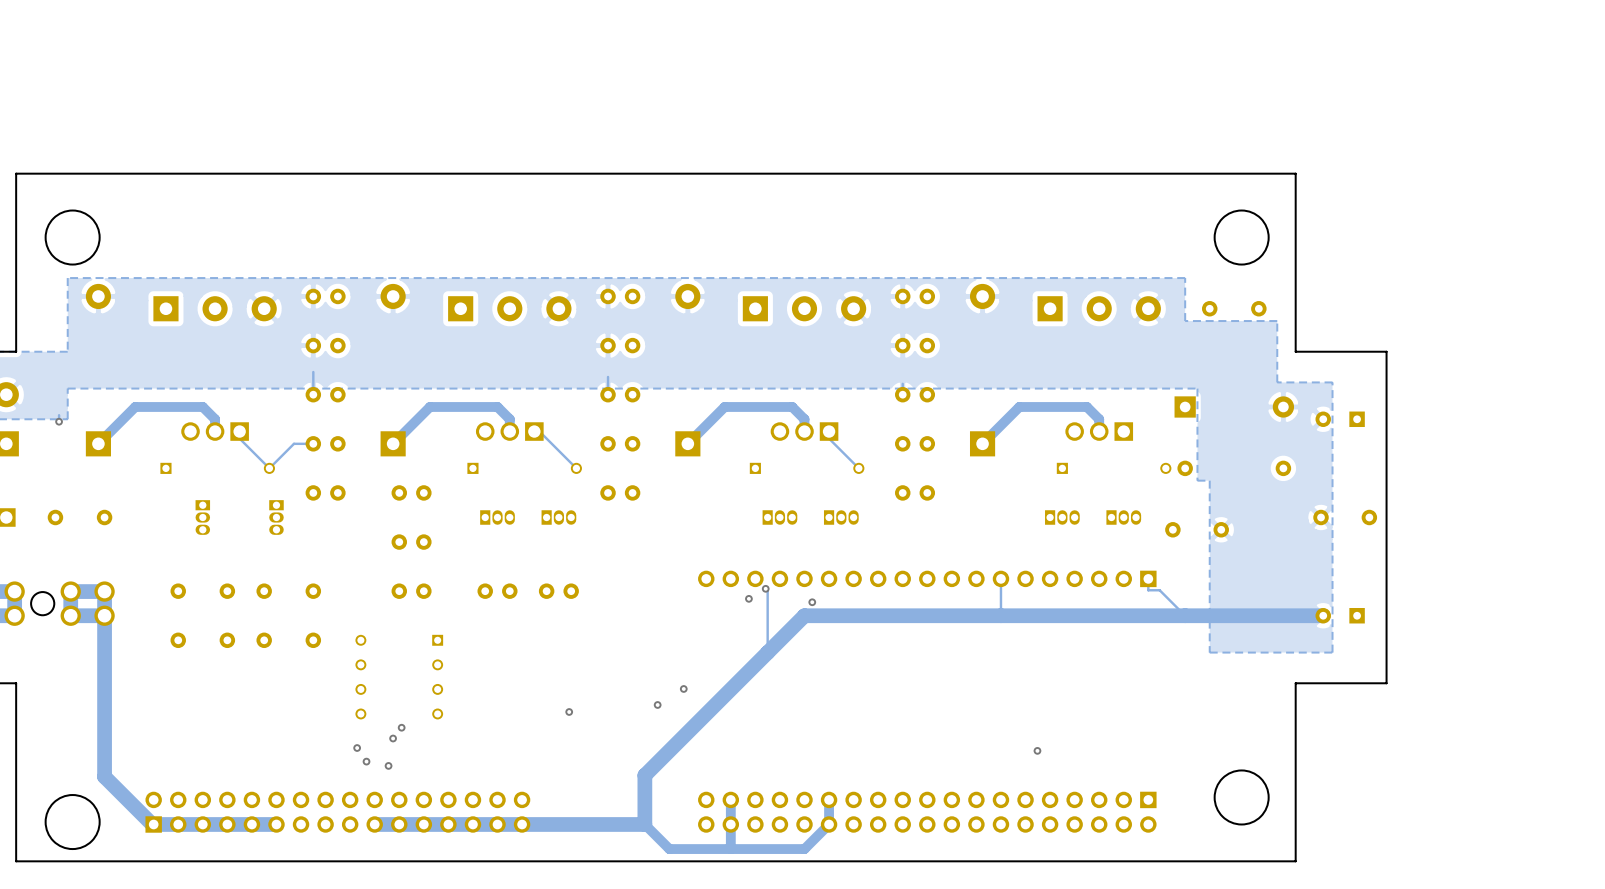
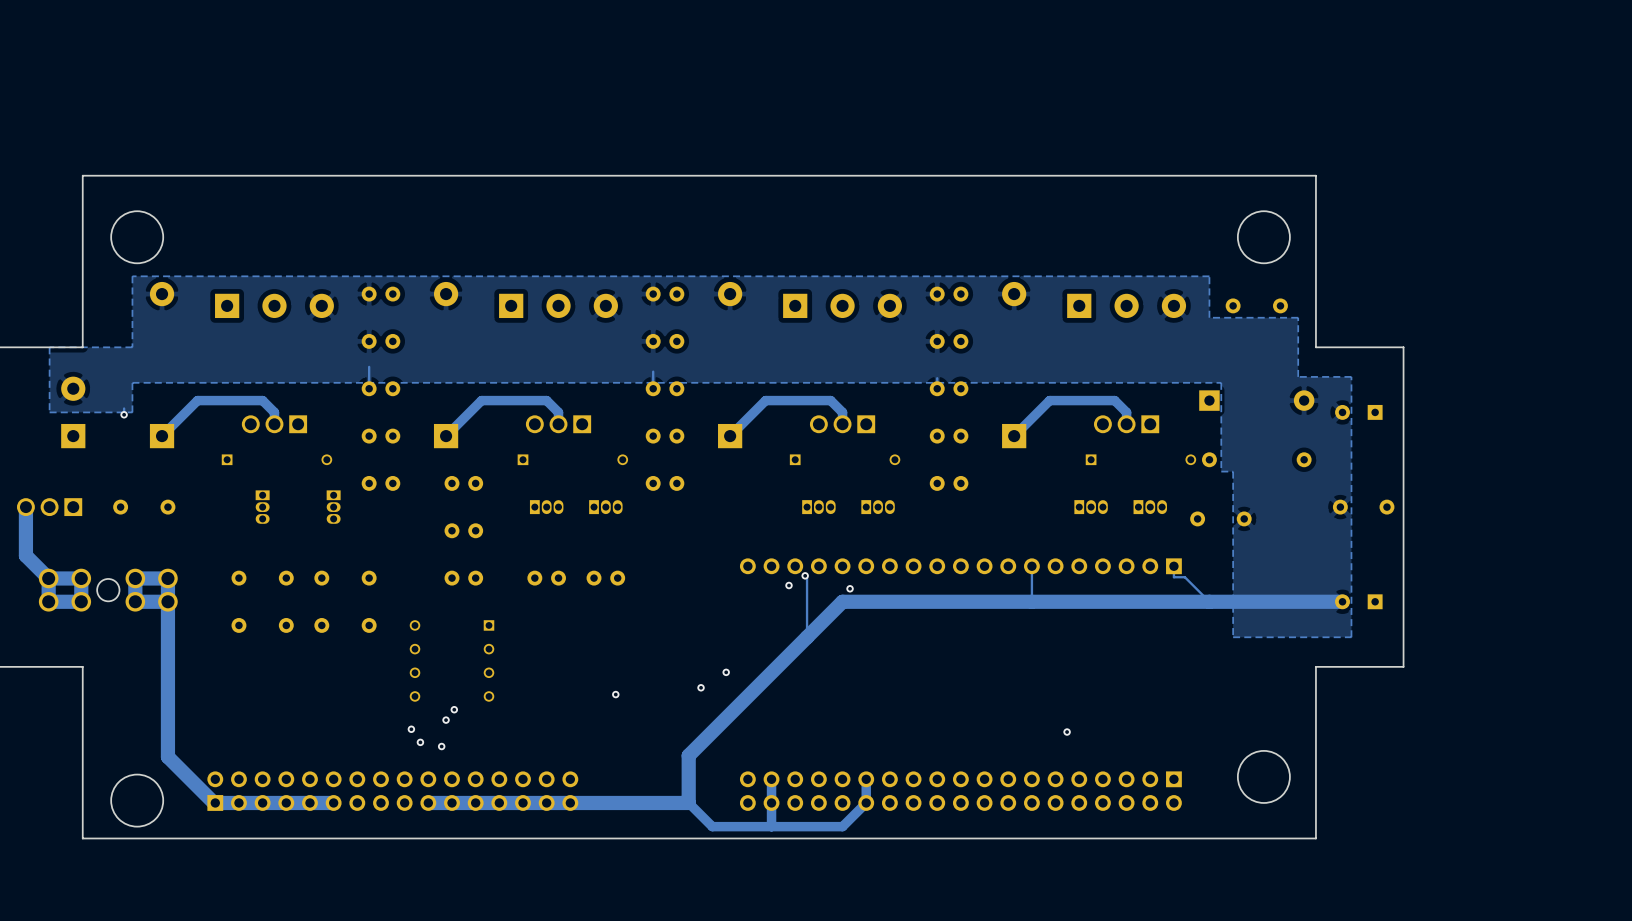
track: (239, 431) (239, 438) (269, 468) (293, 443) (313, 443) -> none
track: (534, 431) (539, 431) (576, 468) -> none
track: (829, 431) (829, 438) (858, 468) -> none

